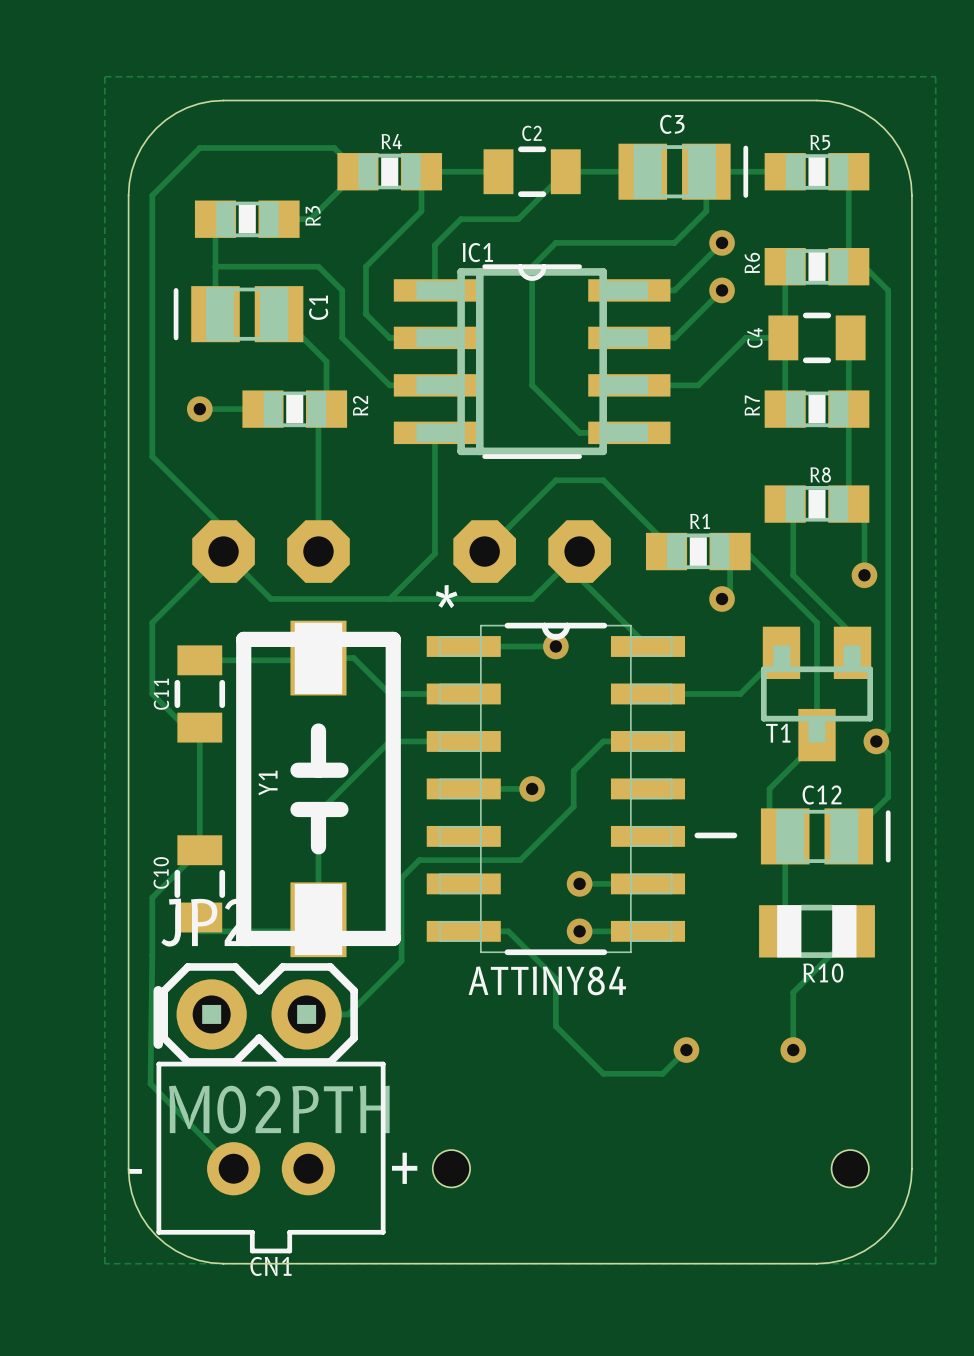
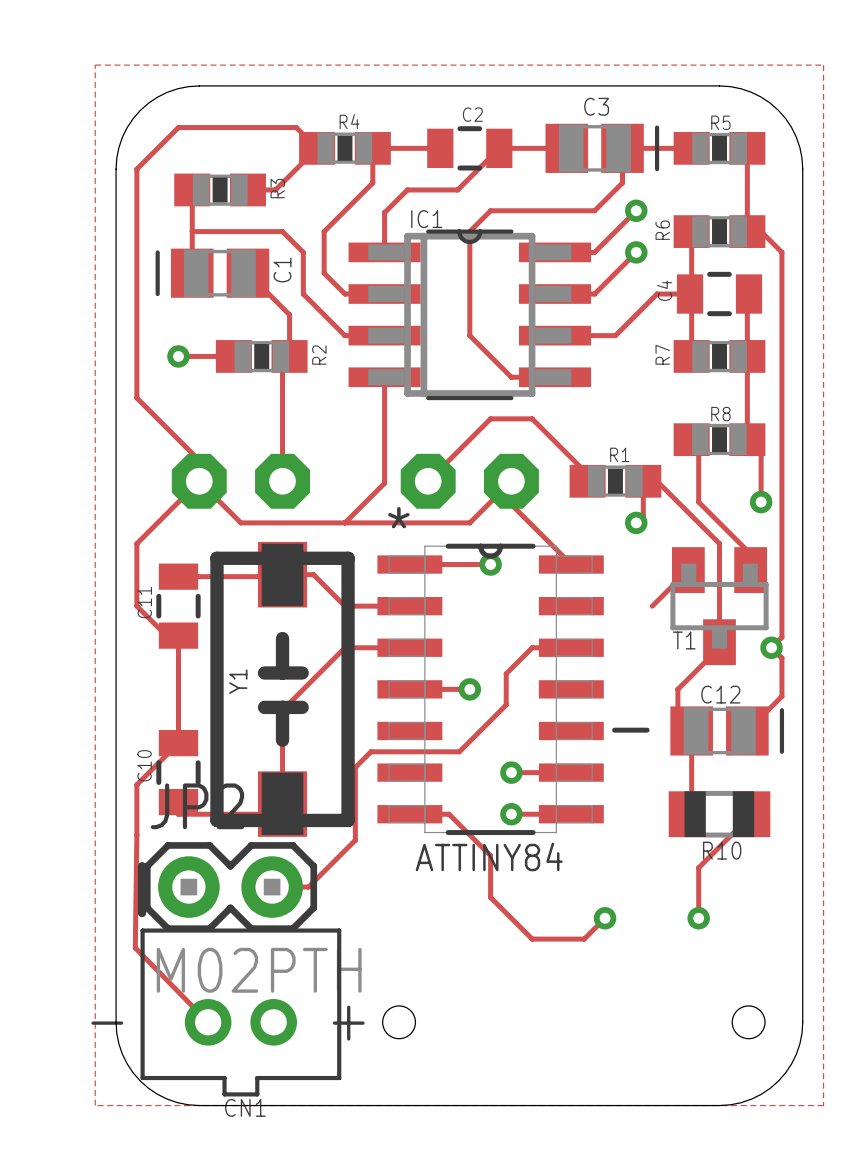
track: (647, 693) (740, 693) -> none

